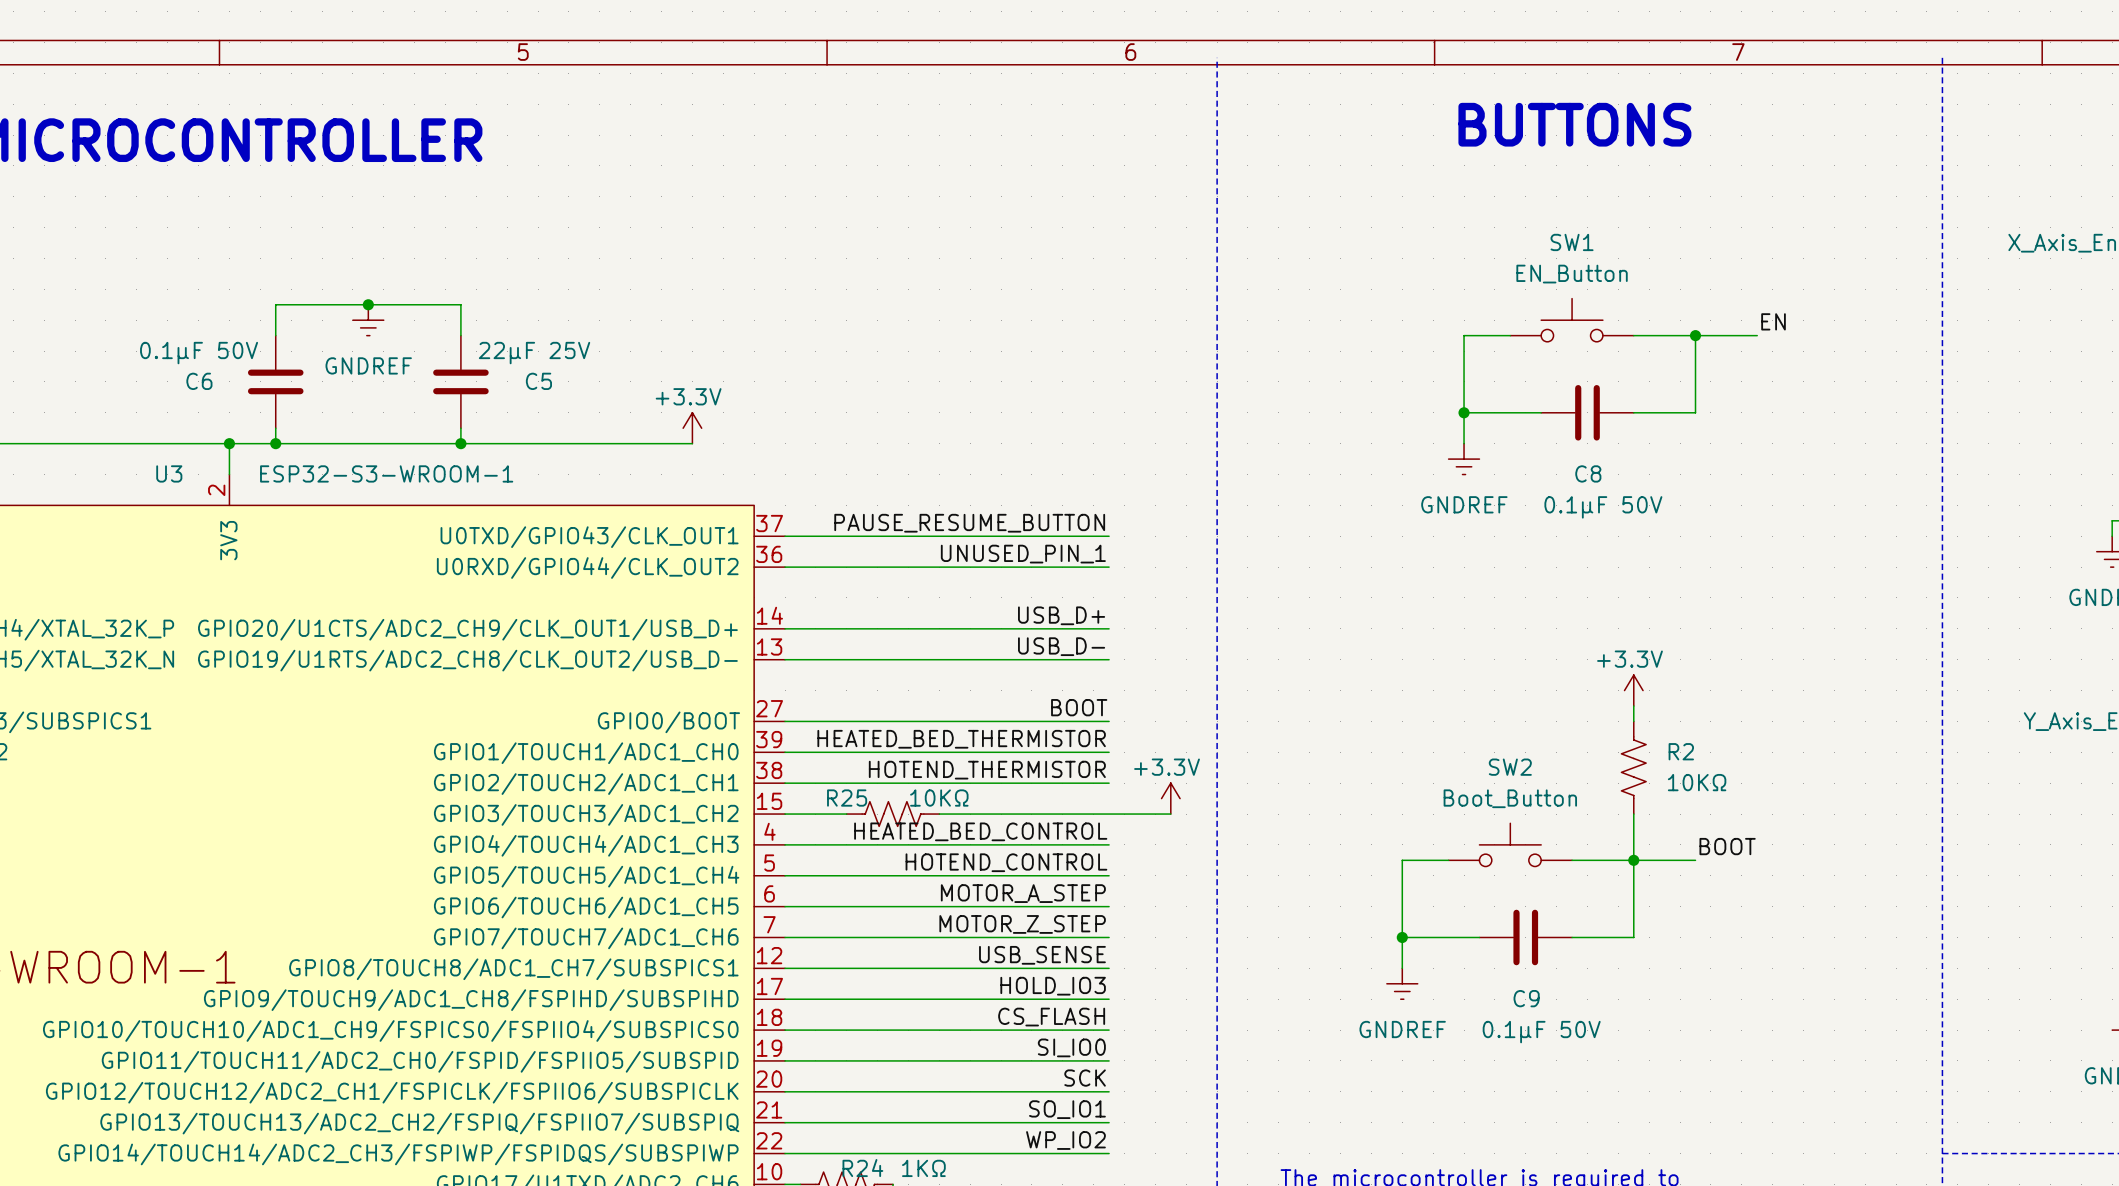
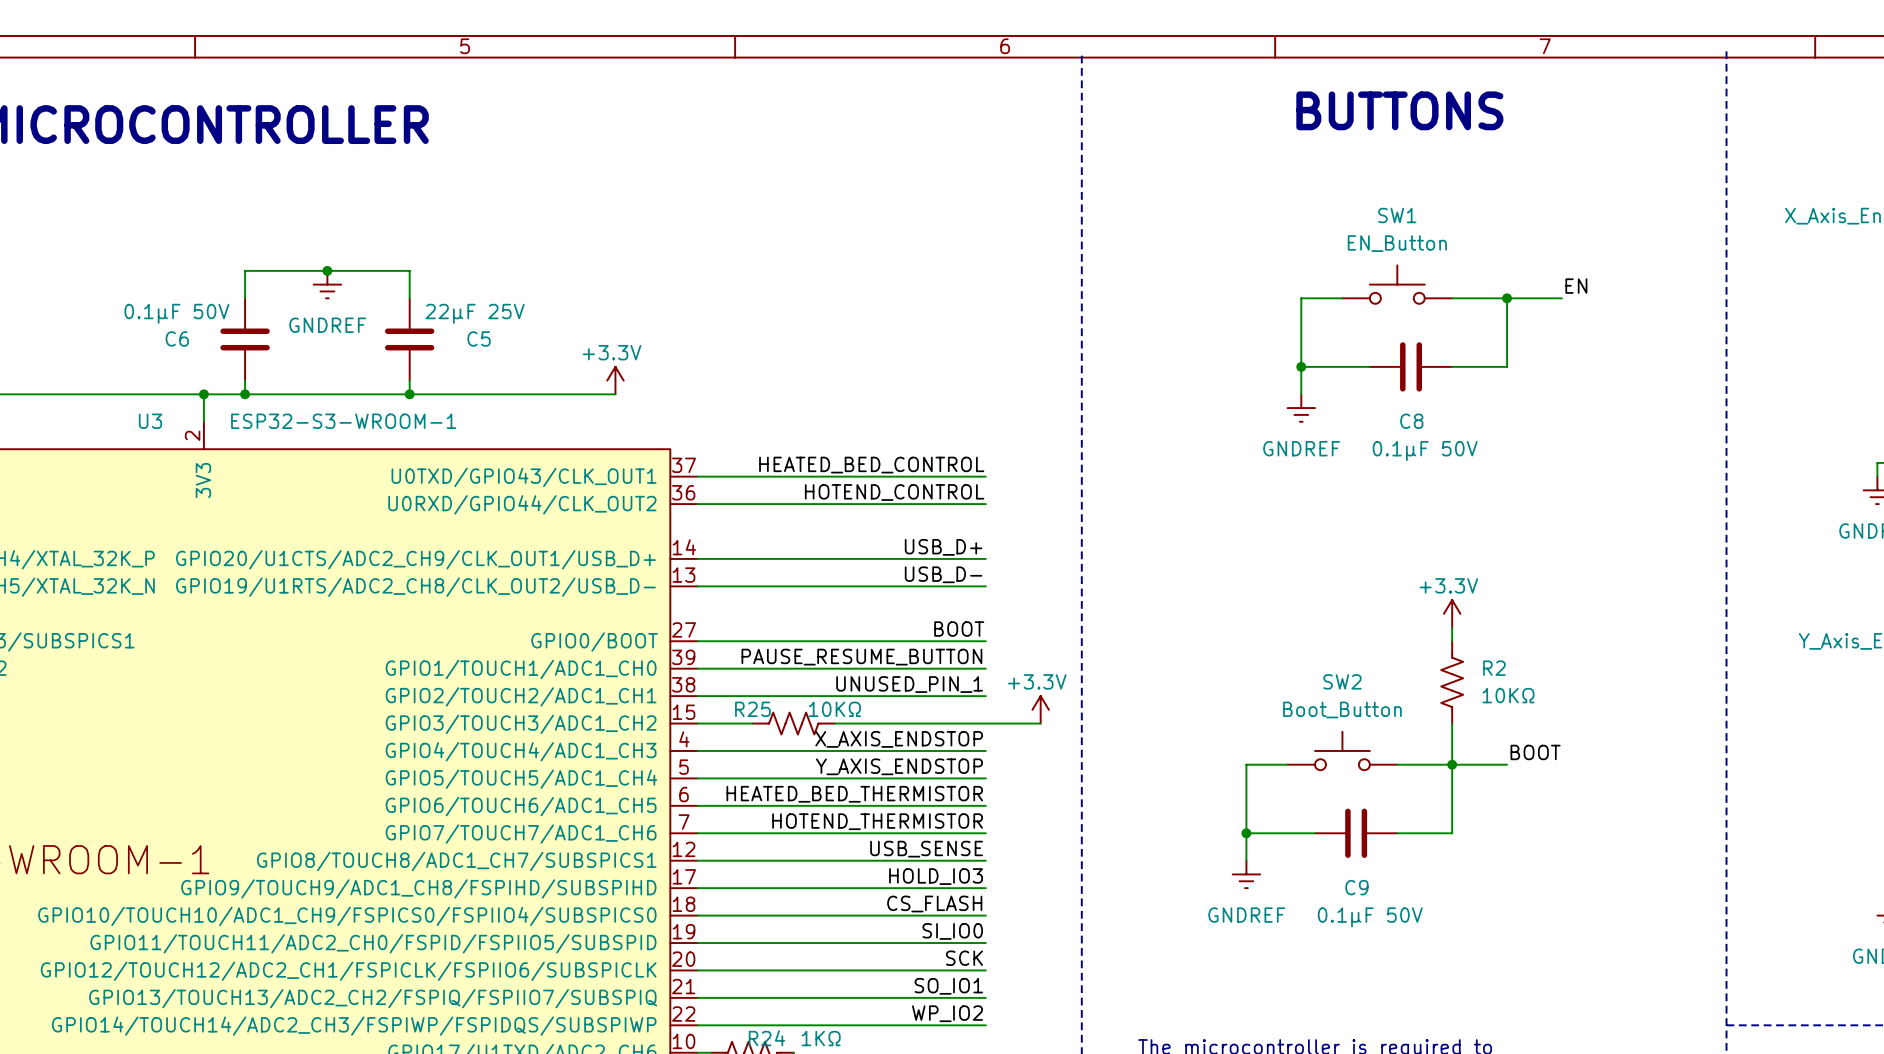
label: PAUSE_RESUME_BUTTON (969, 523) -> HEATED_BED_CONTROL (871, 465)
label: UNUSED_PIN_1 (1023, 554) -> HOTEND_CONTROL (894, 492)
label: HEATED_BED_THERMISTOR (961, 739) -> PAUSE_RESUME_BUTTON (861, 657)
label: HOTEND_THERMISTOR (987, 770) -> UNUSED_PIN_1 (909, 684)
label: HEATED_BED_CONTROL (980, 831) -> X_AXIS_ENDSTOP (899, 739)
label: HOTEND_CONTROL (1006, 862) -> Y_AXIS_ENDSTOP (899, 766)
label: MOTOR_A_STEP (1023, 893) -> HEATED_BED_THERMISTOR (854, 794)
label: MOTOR_Z_STEP (1022, 924) -> HOTEND_THERMISTOR (877, 821)

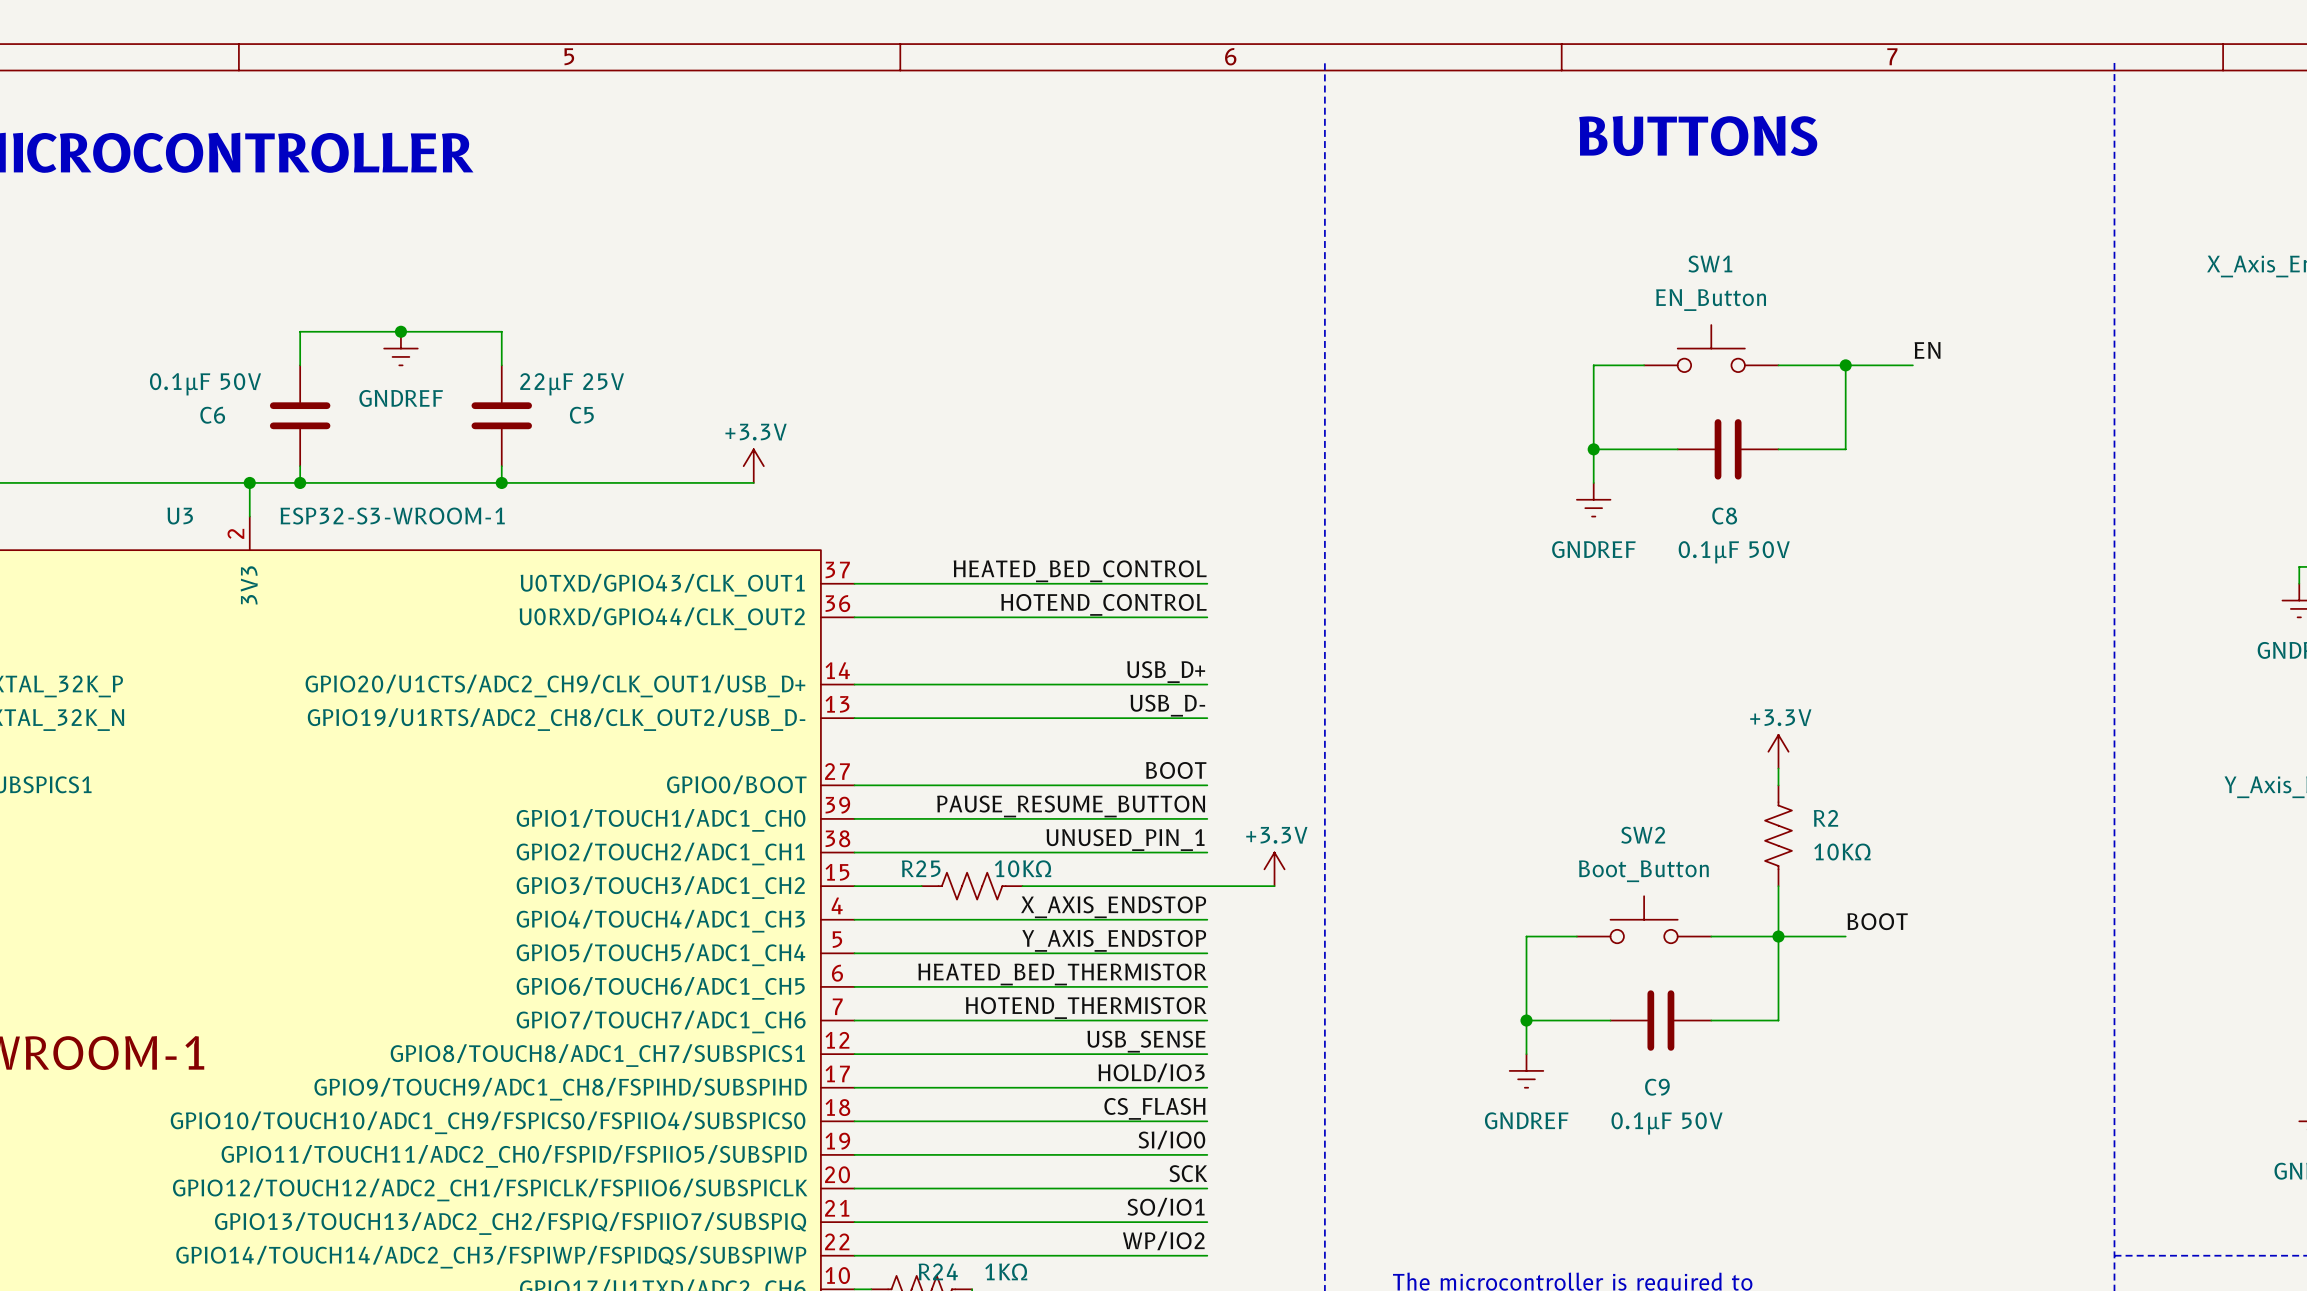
label: HOLD_IO3 (936, 876) -> HOLD/IO3 (1151, 1072)
label: SI_IO0 (952, 931) -> SI/IO0 (1171, 1140)
label: SO_IO1 (948, 986) -> SO/IO1 (1166, 1207)
label: WP_IO2 (947, 1013) -> WP/IO2 (1163, 1240)

